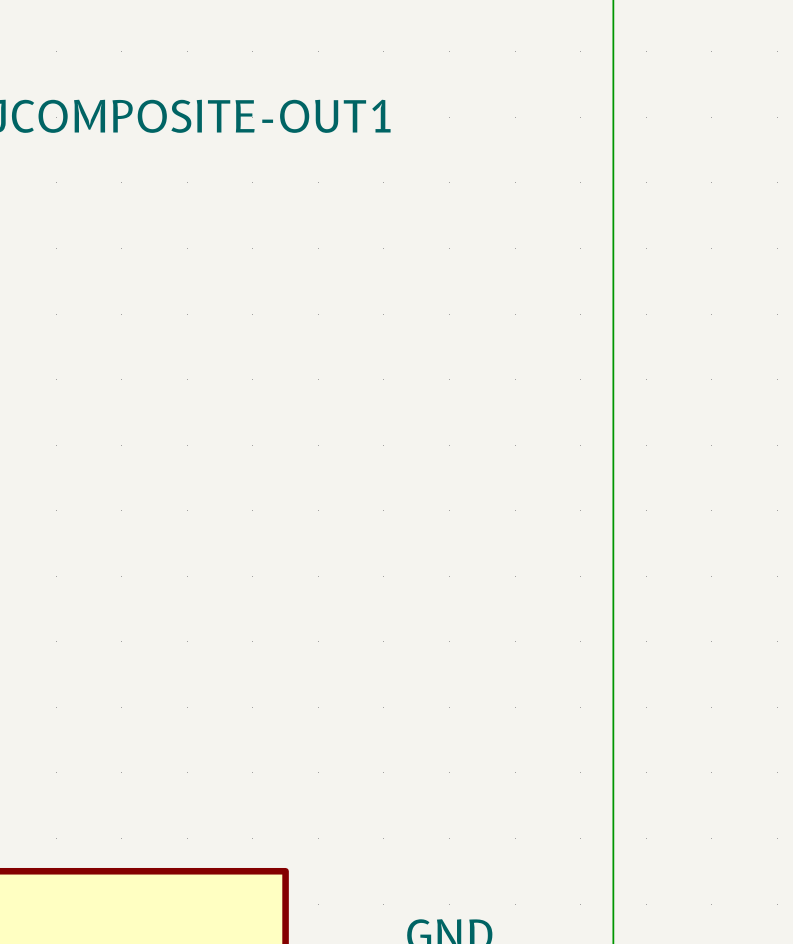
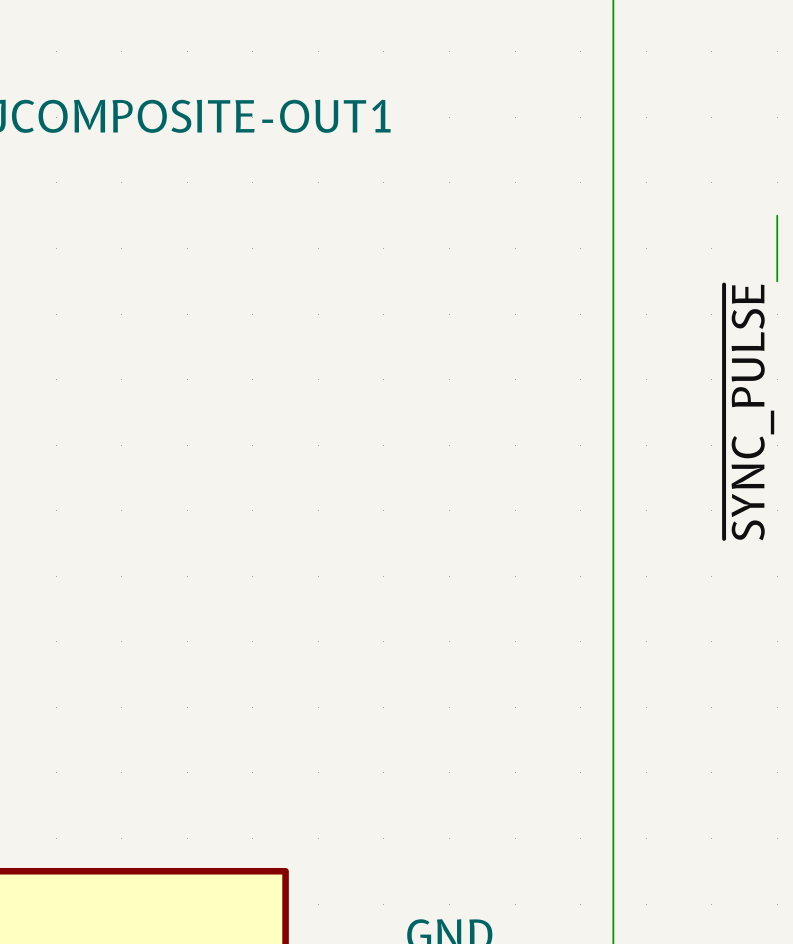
wire: none -> (777, 215) (777, 281)
label: none -> ~{SYNC_PULSE} (749, 412)

